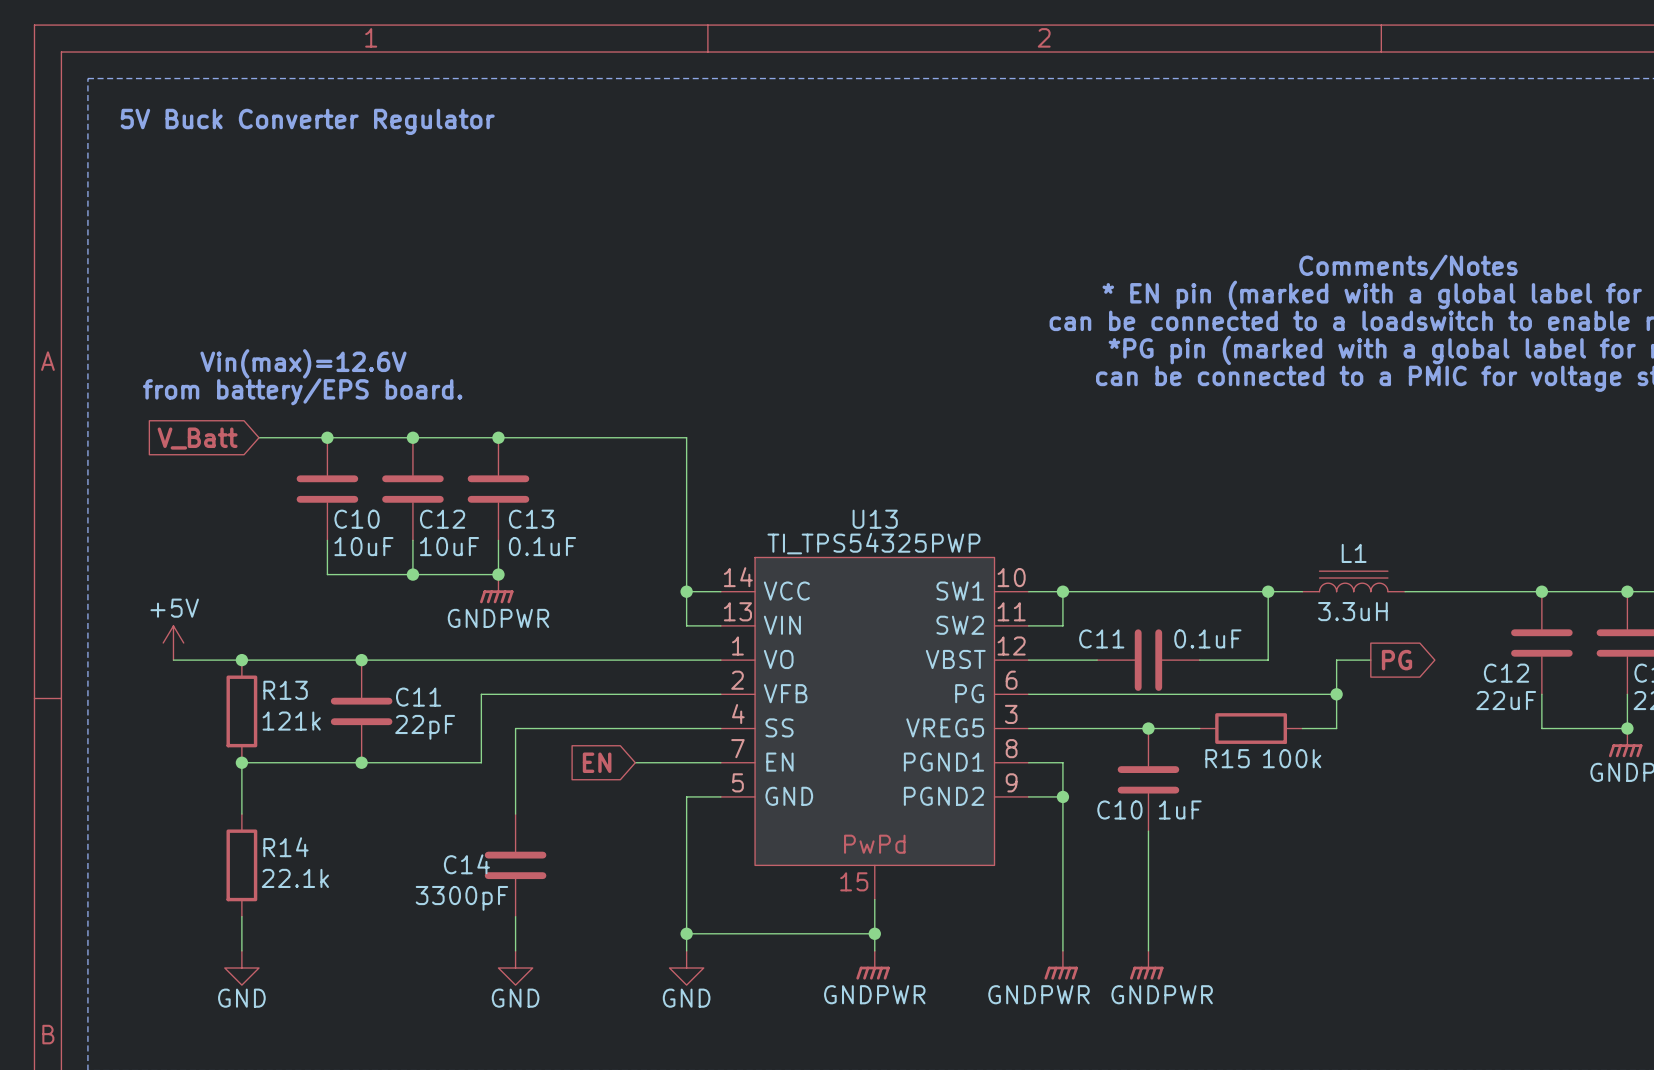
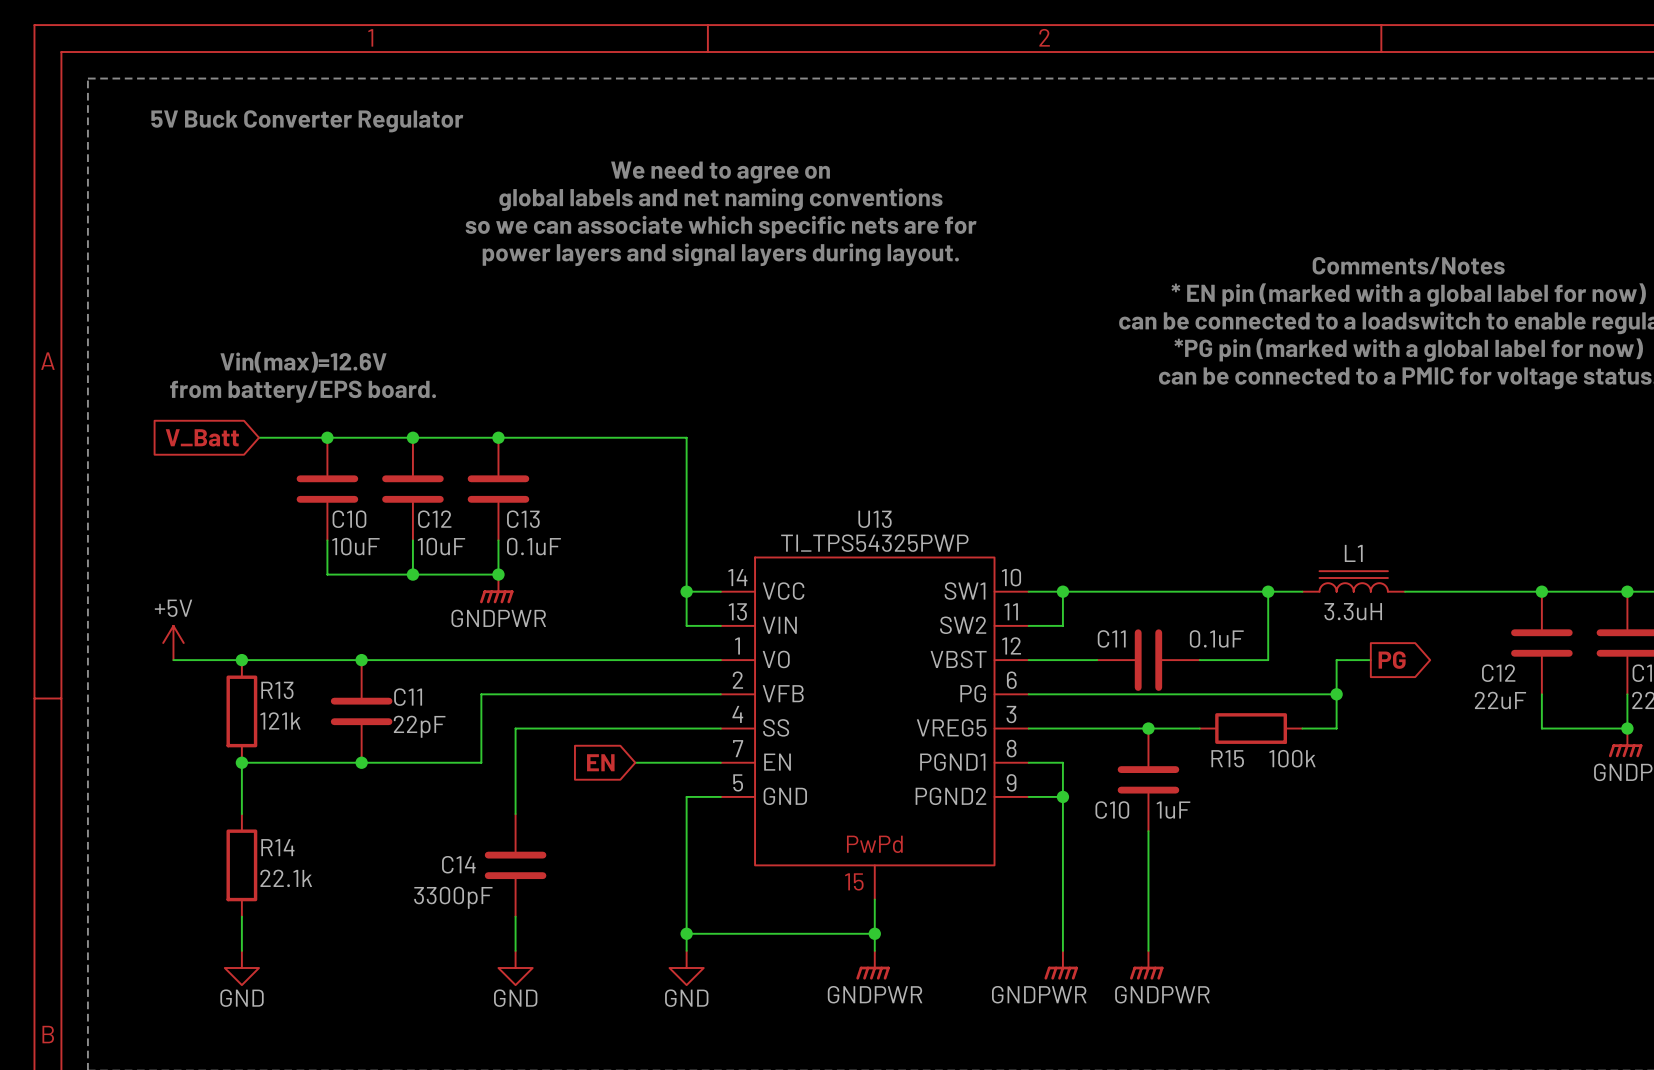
text: none -> We need to agree on (720, 172)
text: none -> global labels and net naming conventions (720, 199)
text: none -> so we can associate which specific nets are for (721, 227)
text: none -> power layers and signal layers during layout. (720, 254)

